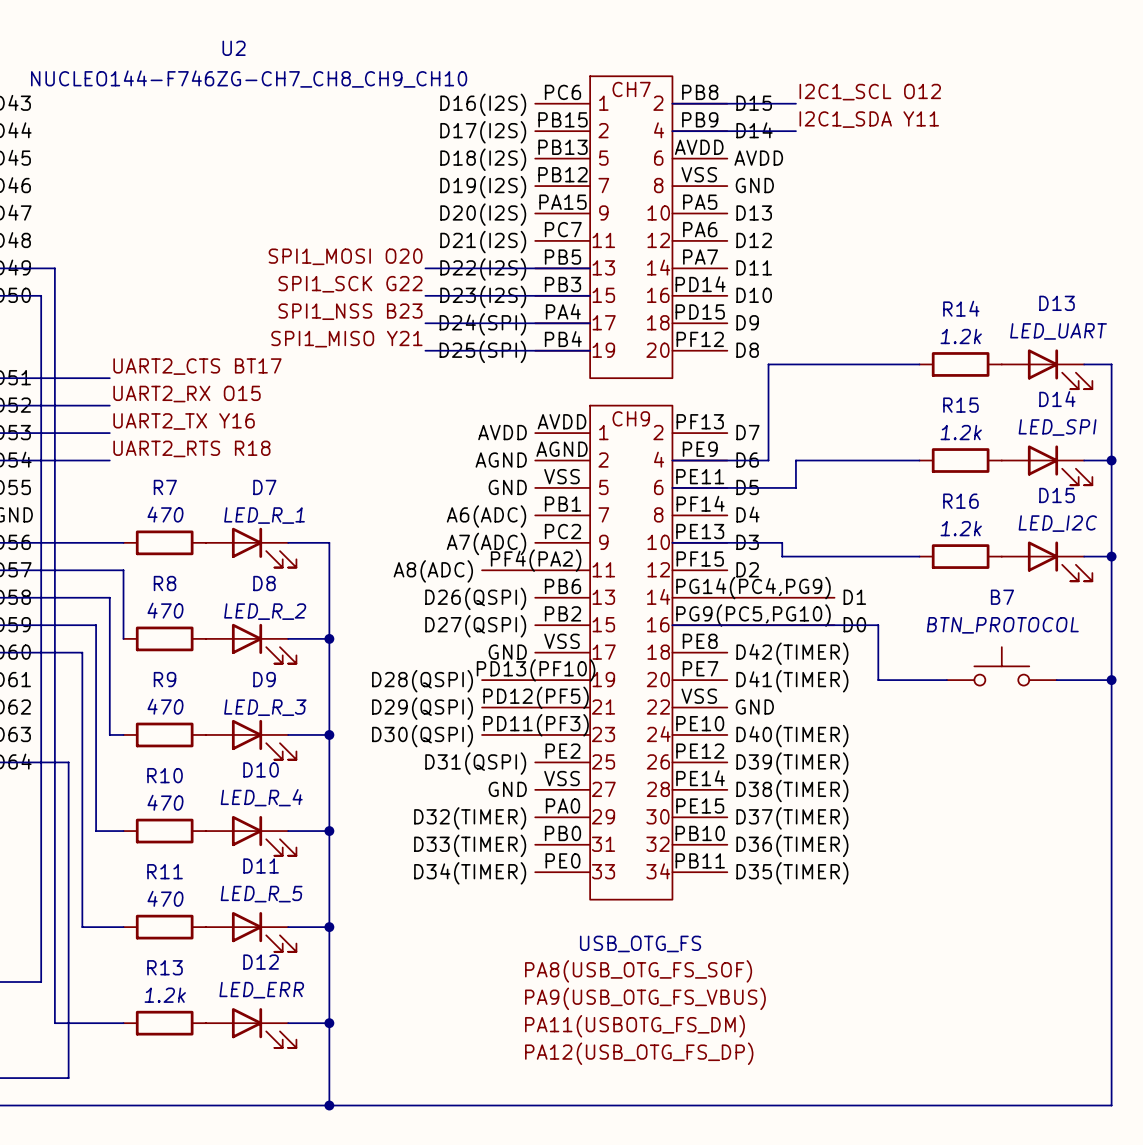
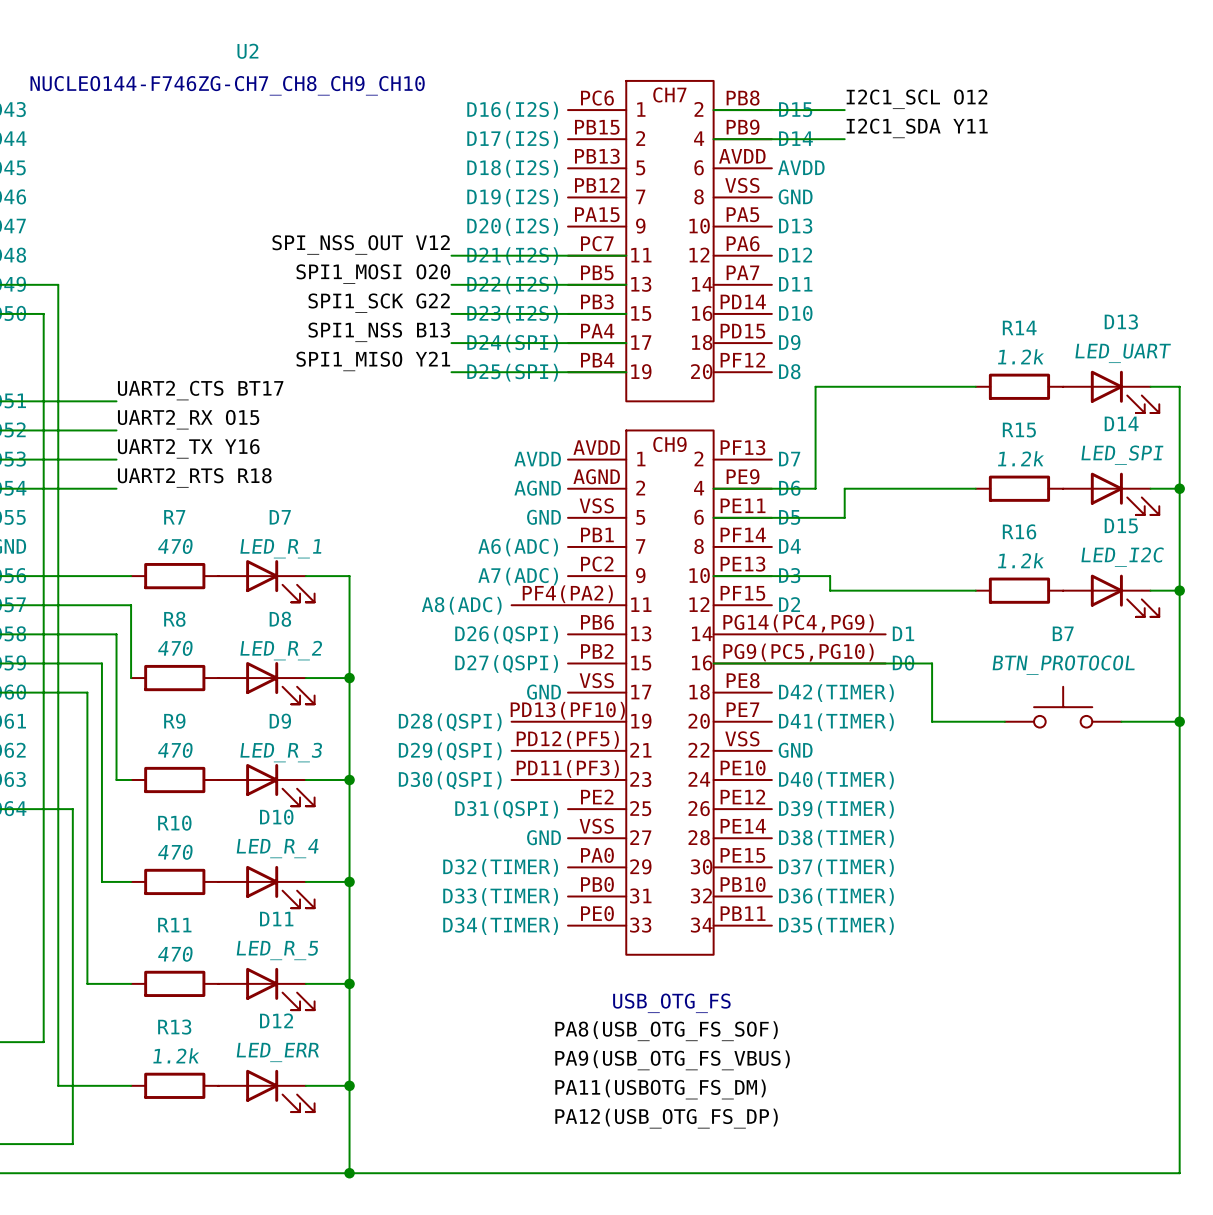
label: none -> SPI_NSS_OUT V12 (361, 244)
wire: none -> (451, 255) (626, 255)
label: SPI1_NSS B23 (350, 311) -> SPI1_NSS B13 (379, 332)

